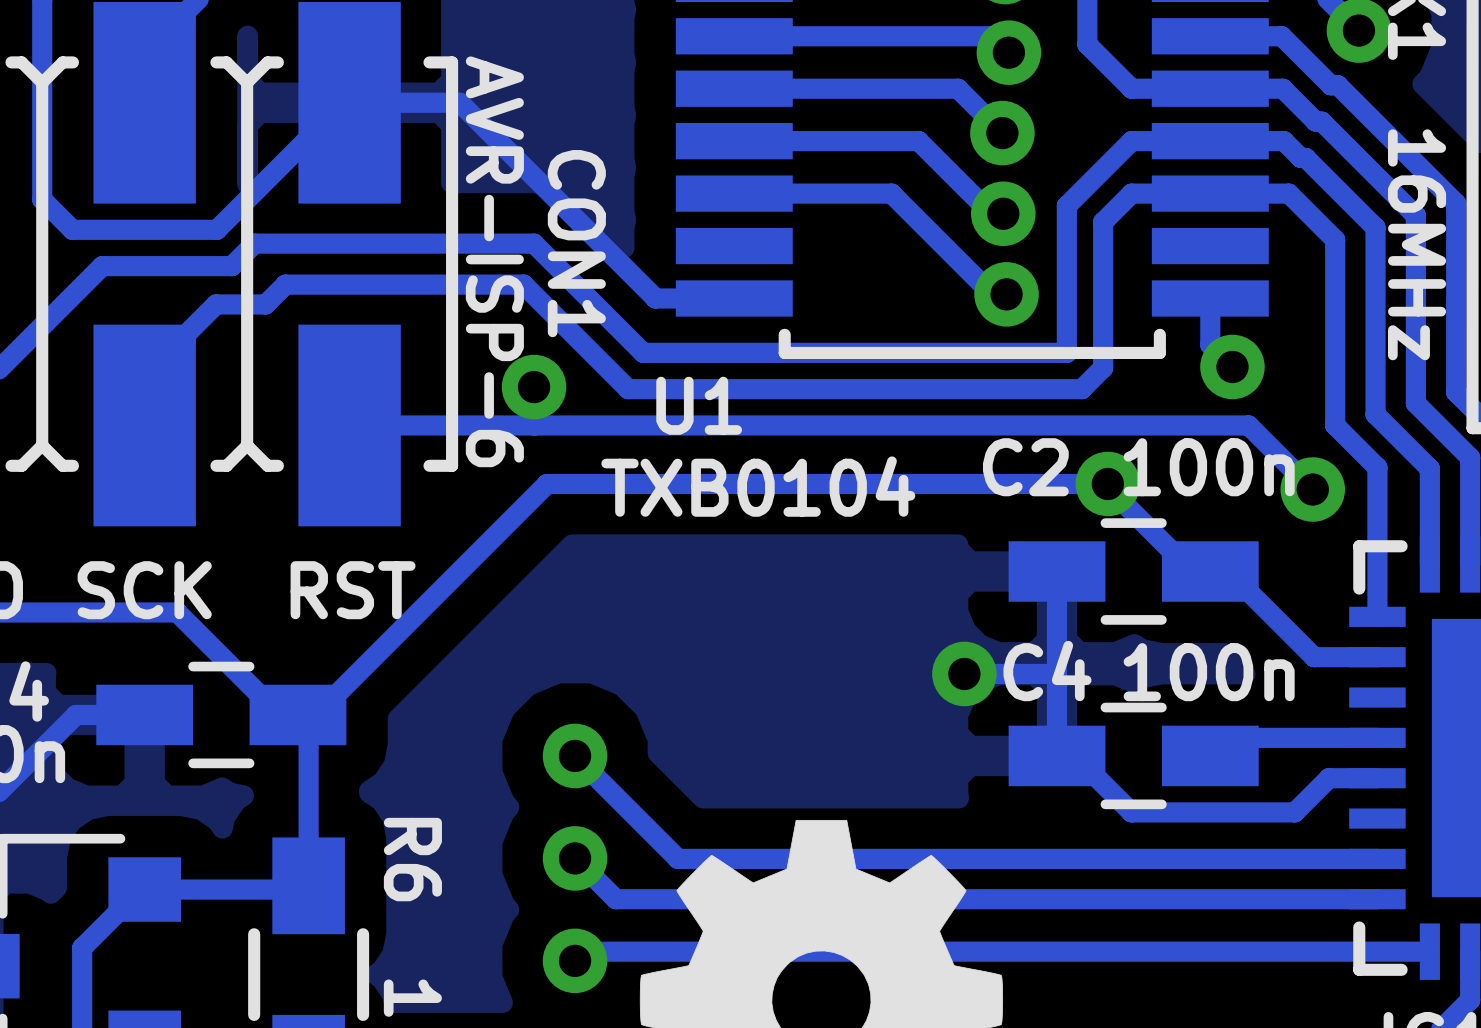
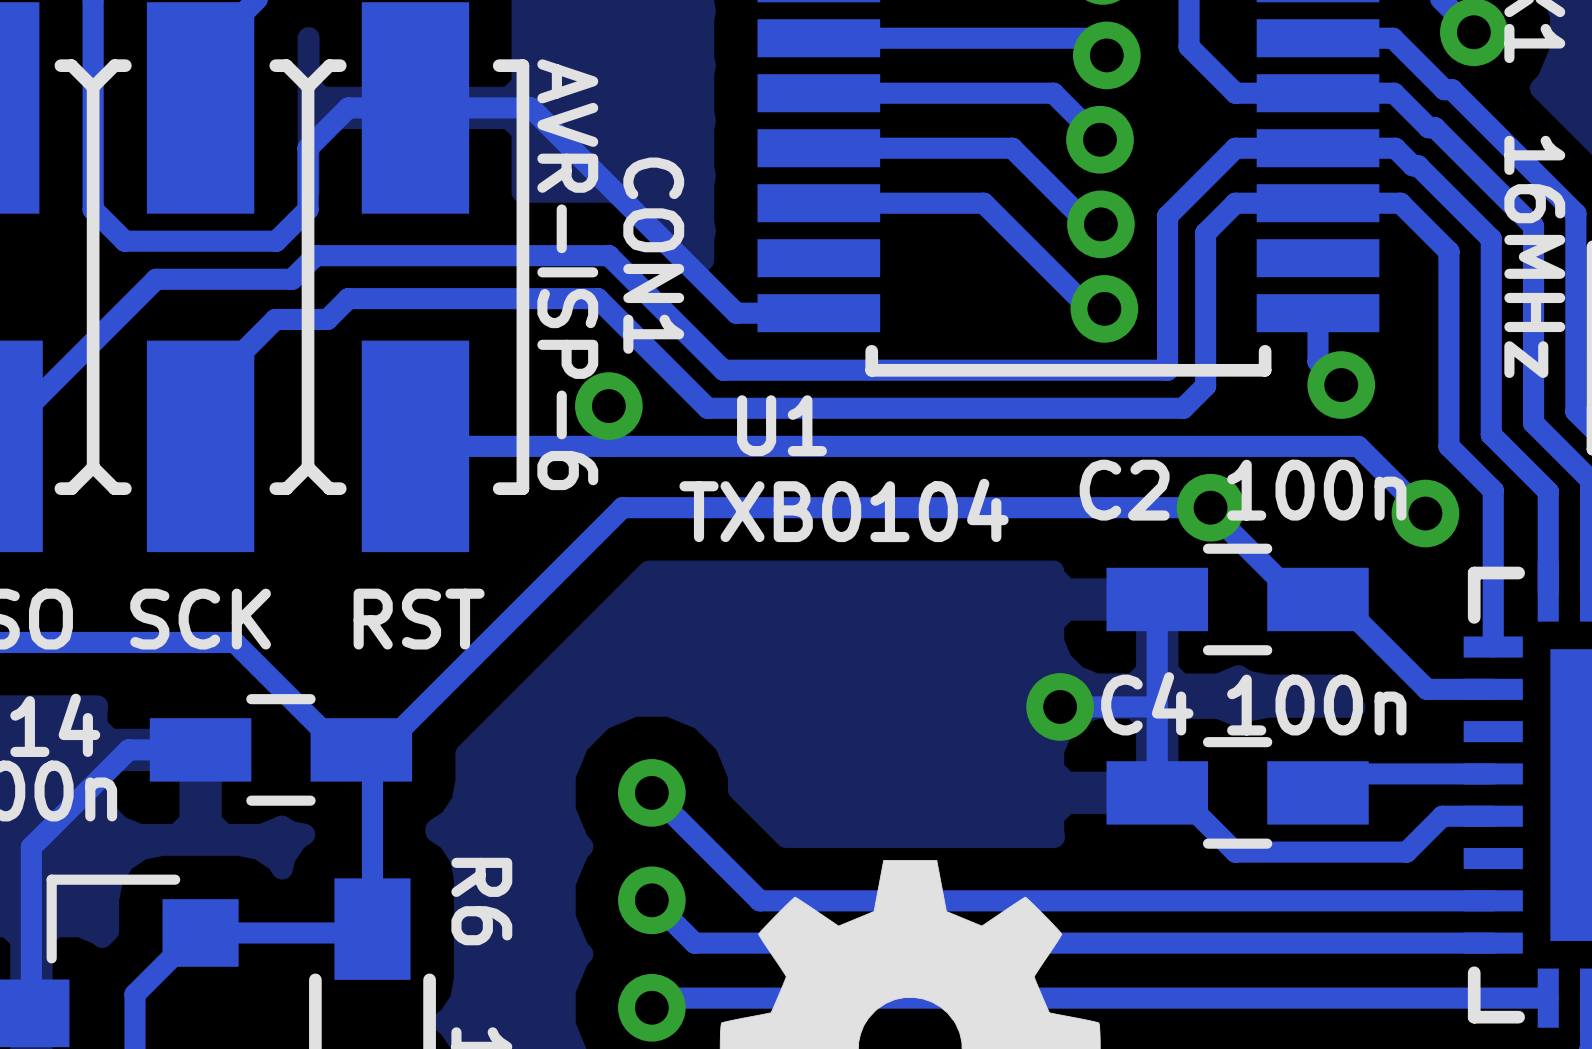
track: (343, 102) (247, 199) -> (409, 107) (348, 107) (308, 148) (308, 209)

